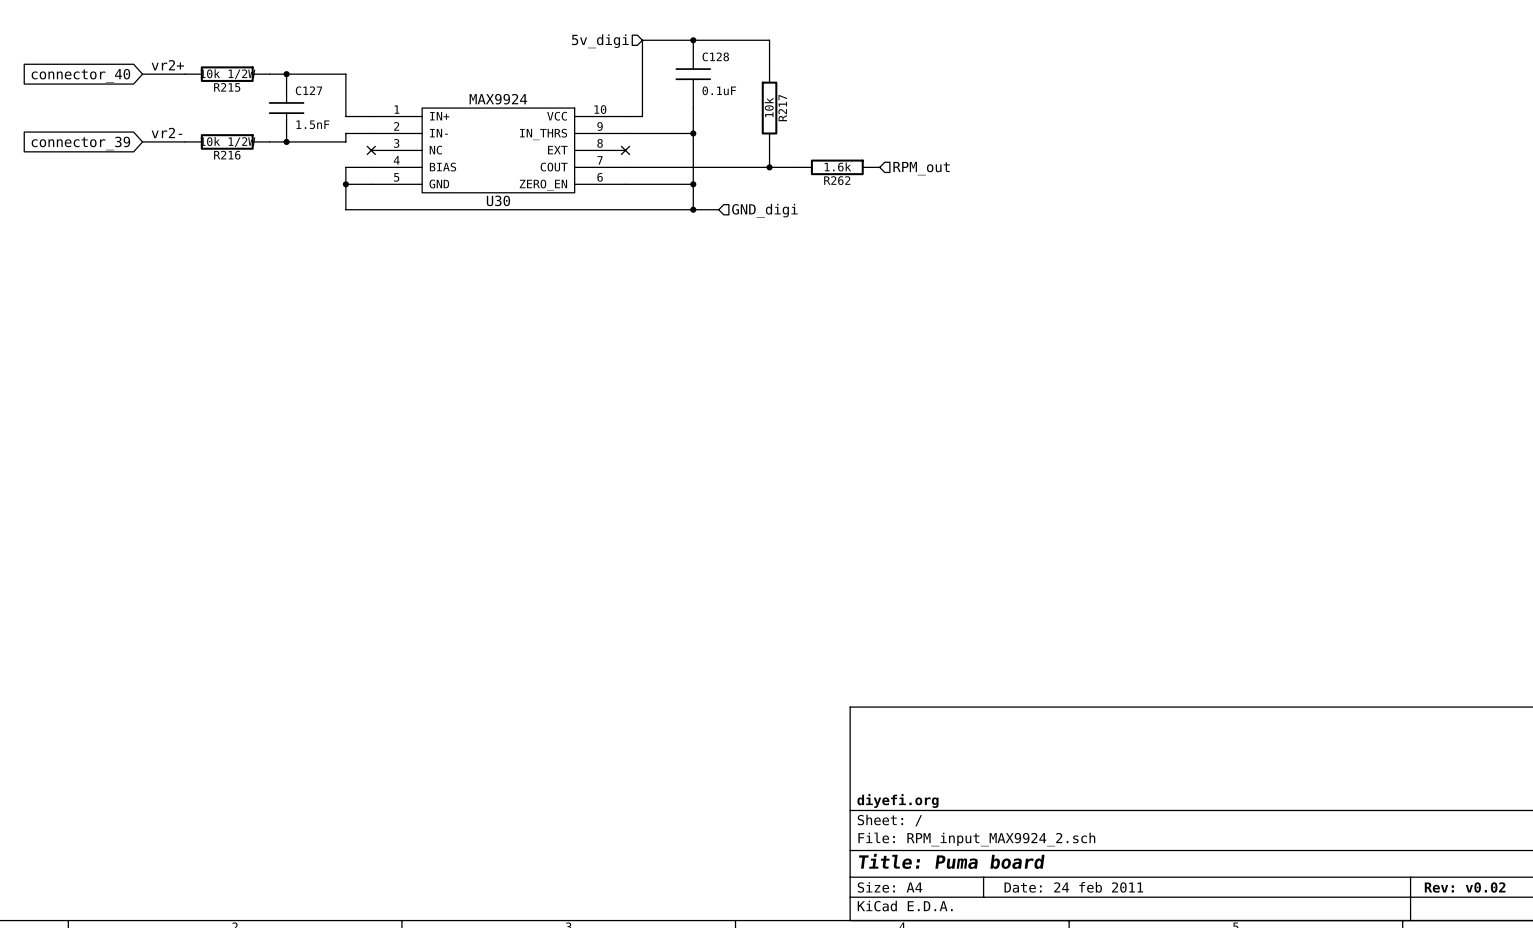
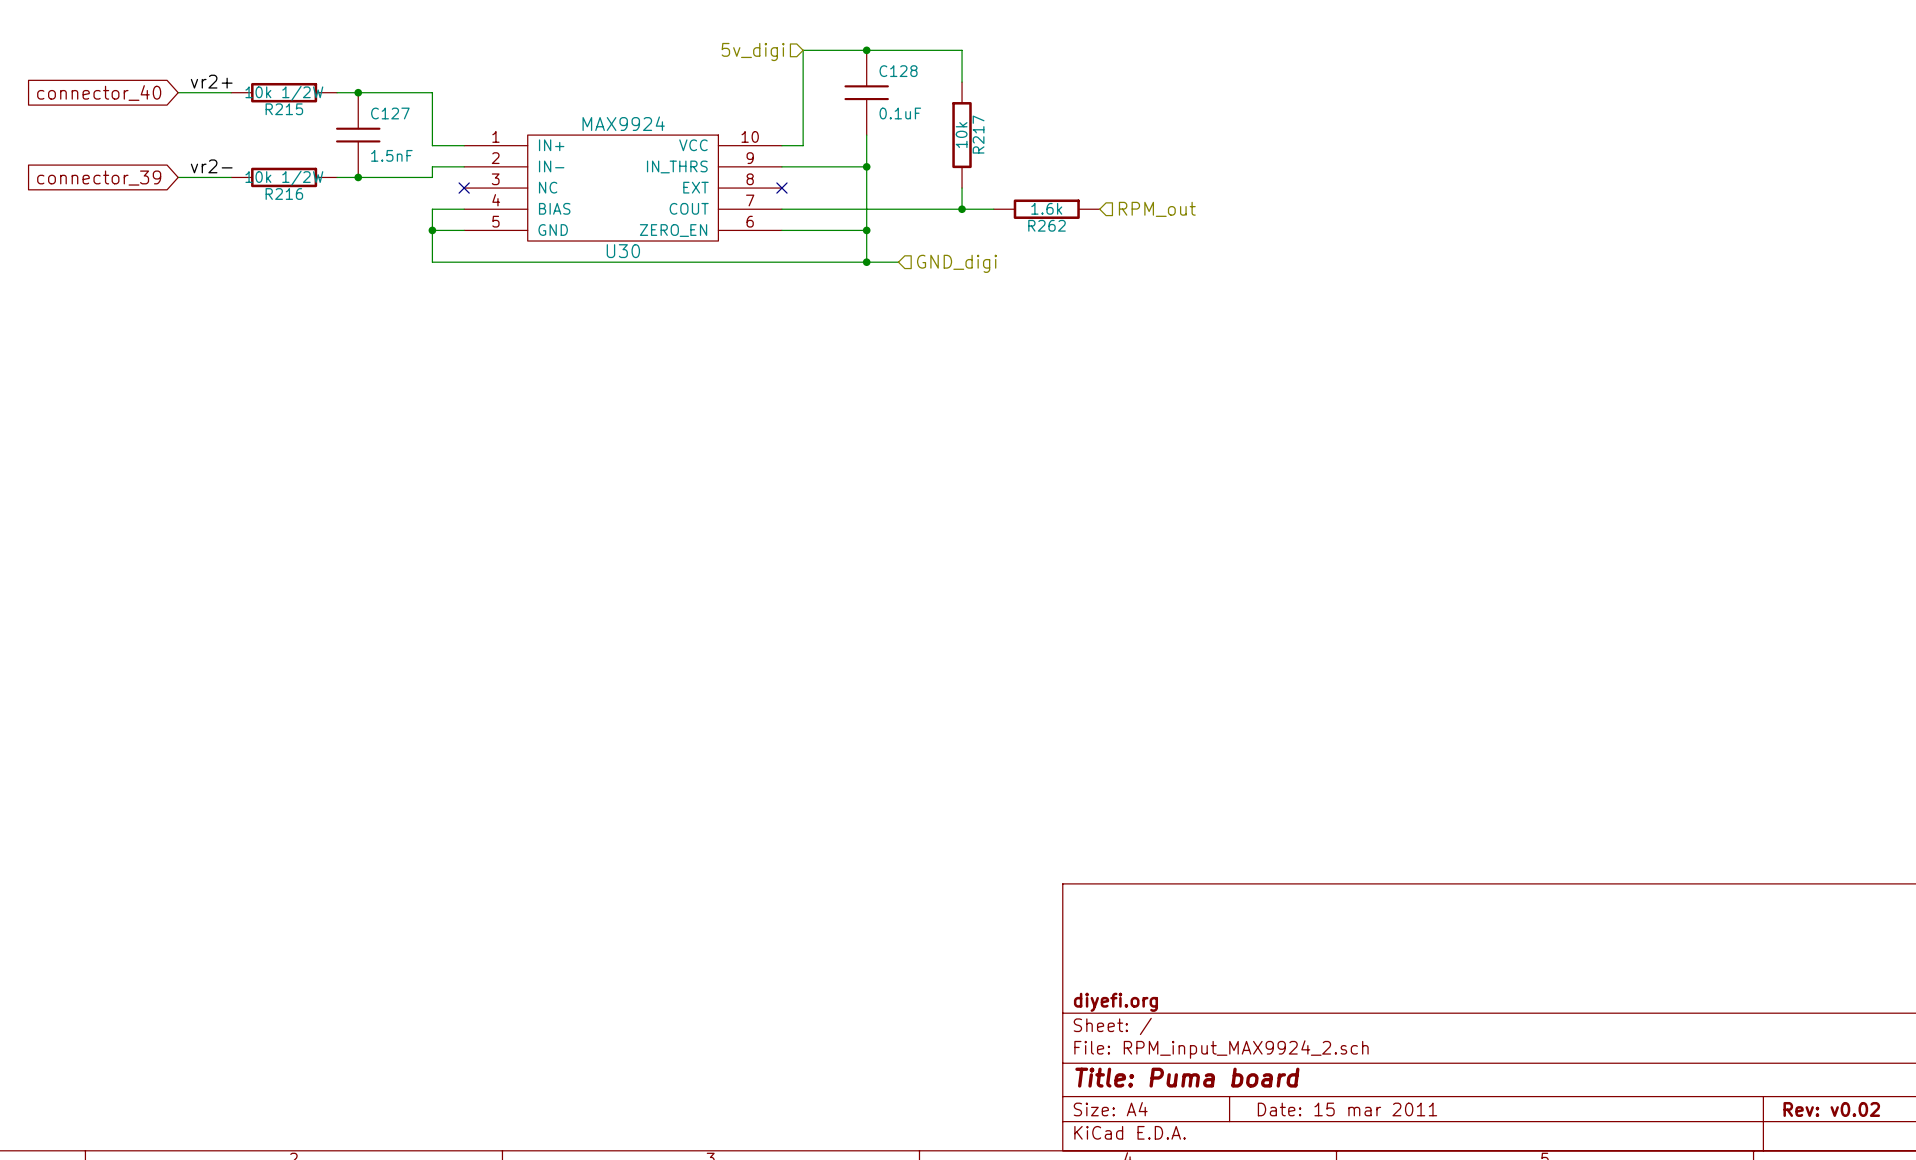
title block: Date: 24 feb 2011 (1073, 887) -> Date: 15 mar 2011 (1347, 1109)

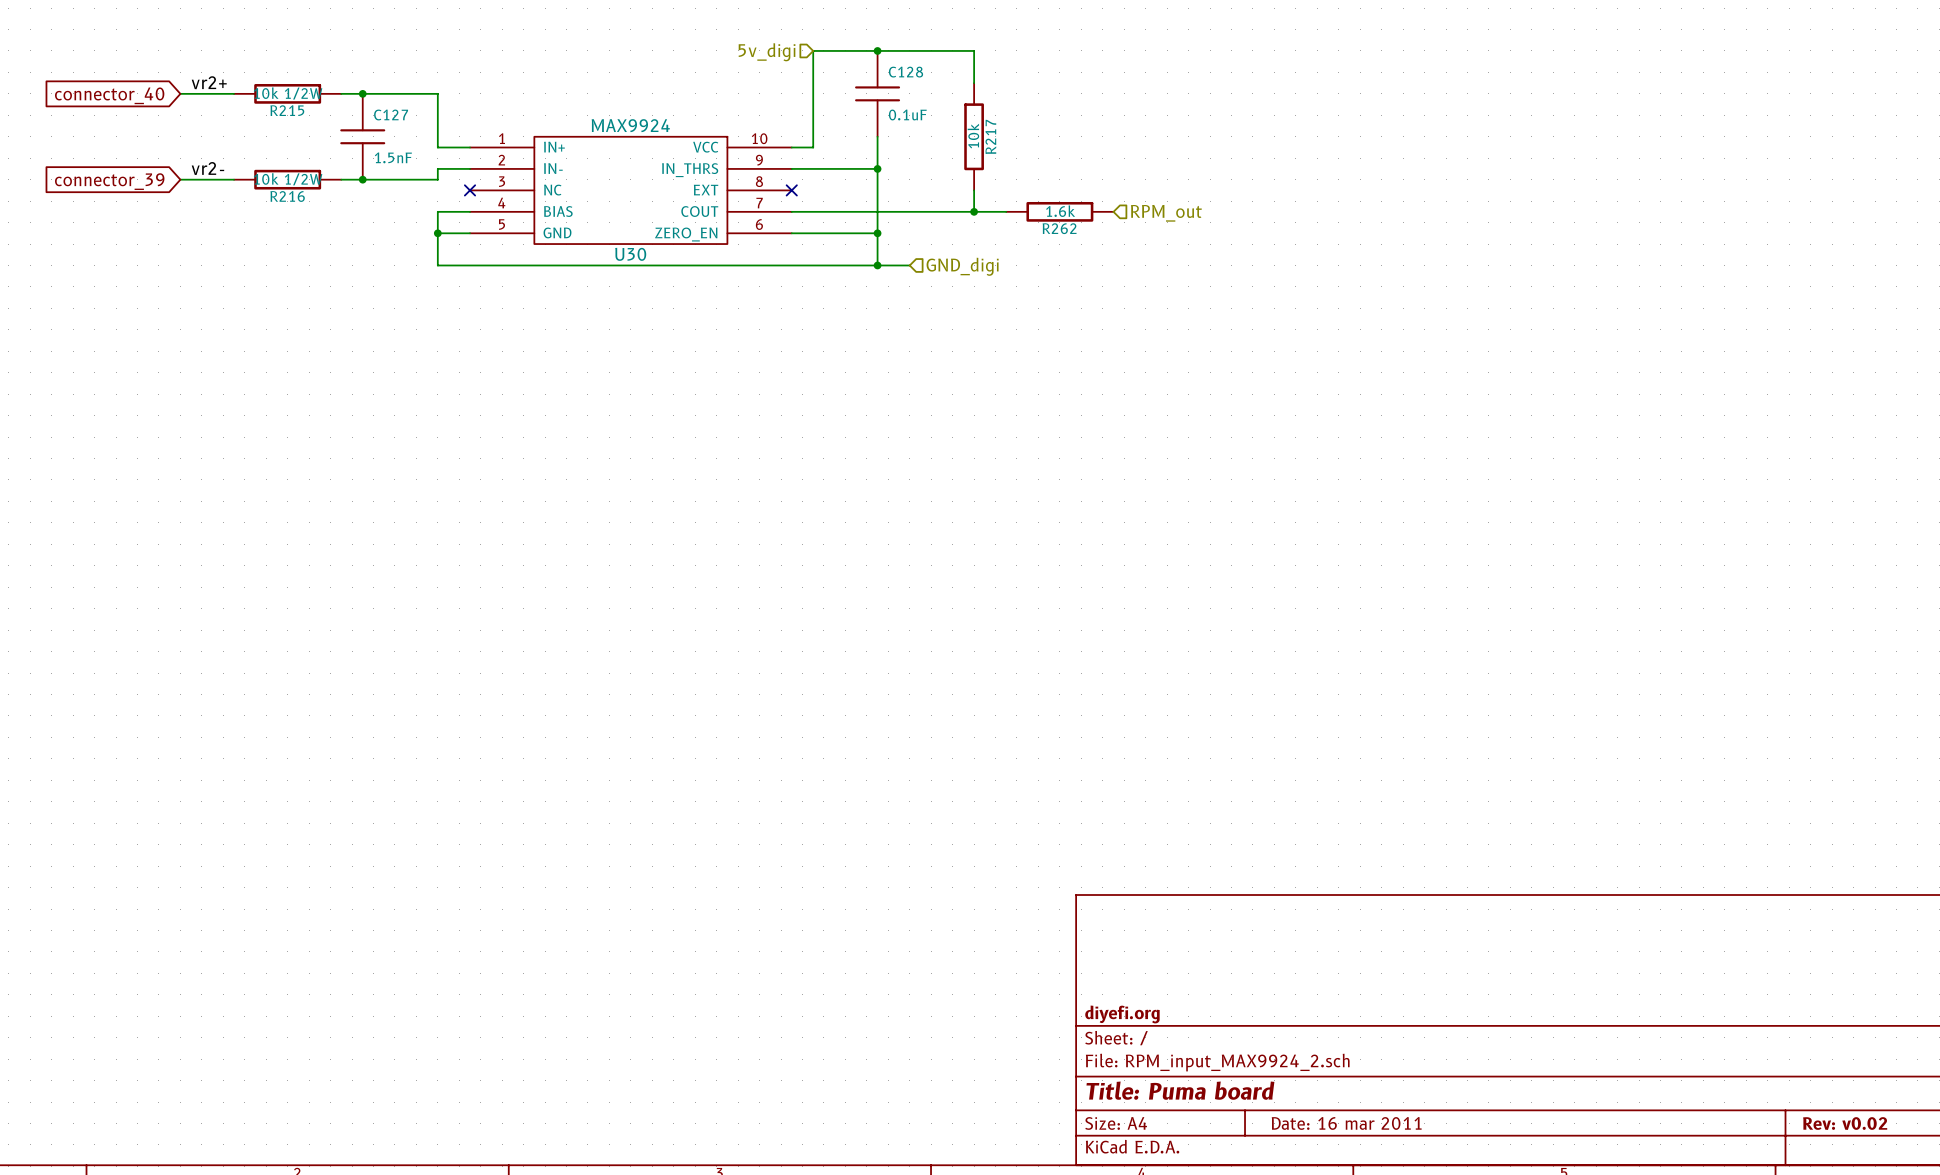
title block: Date: 15 mar 2011 (1347, 1109) -> Date: 16 mar 2011 (1346, 1123)

